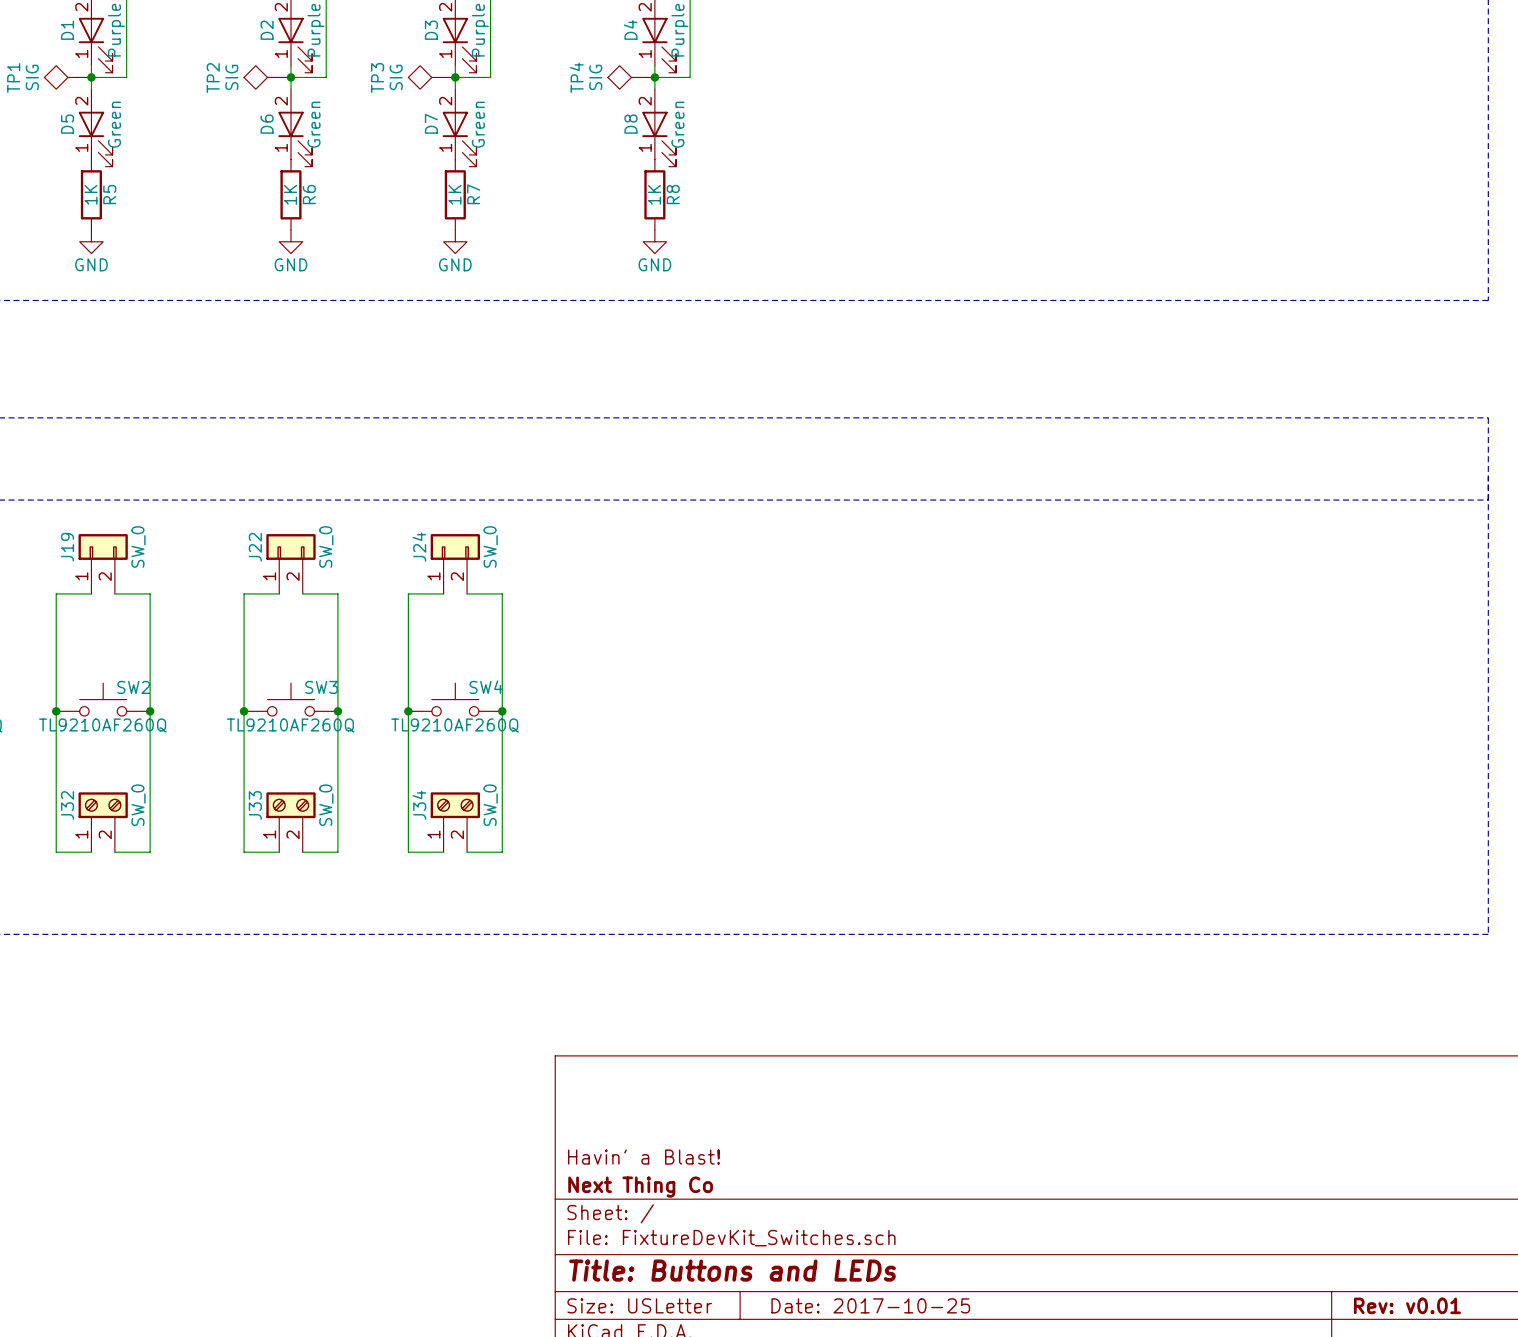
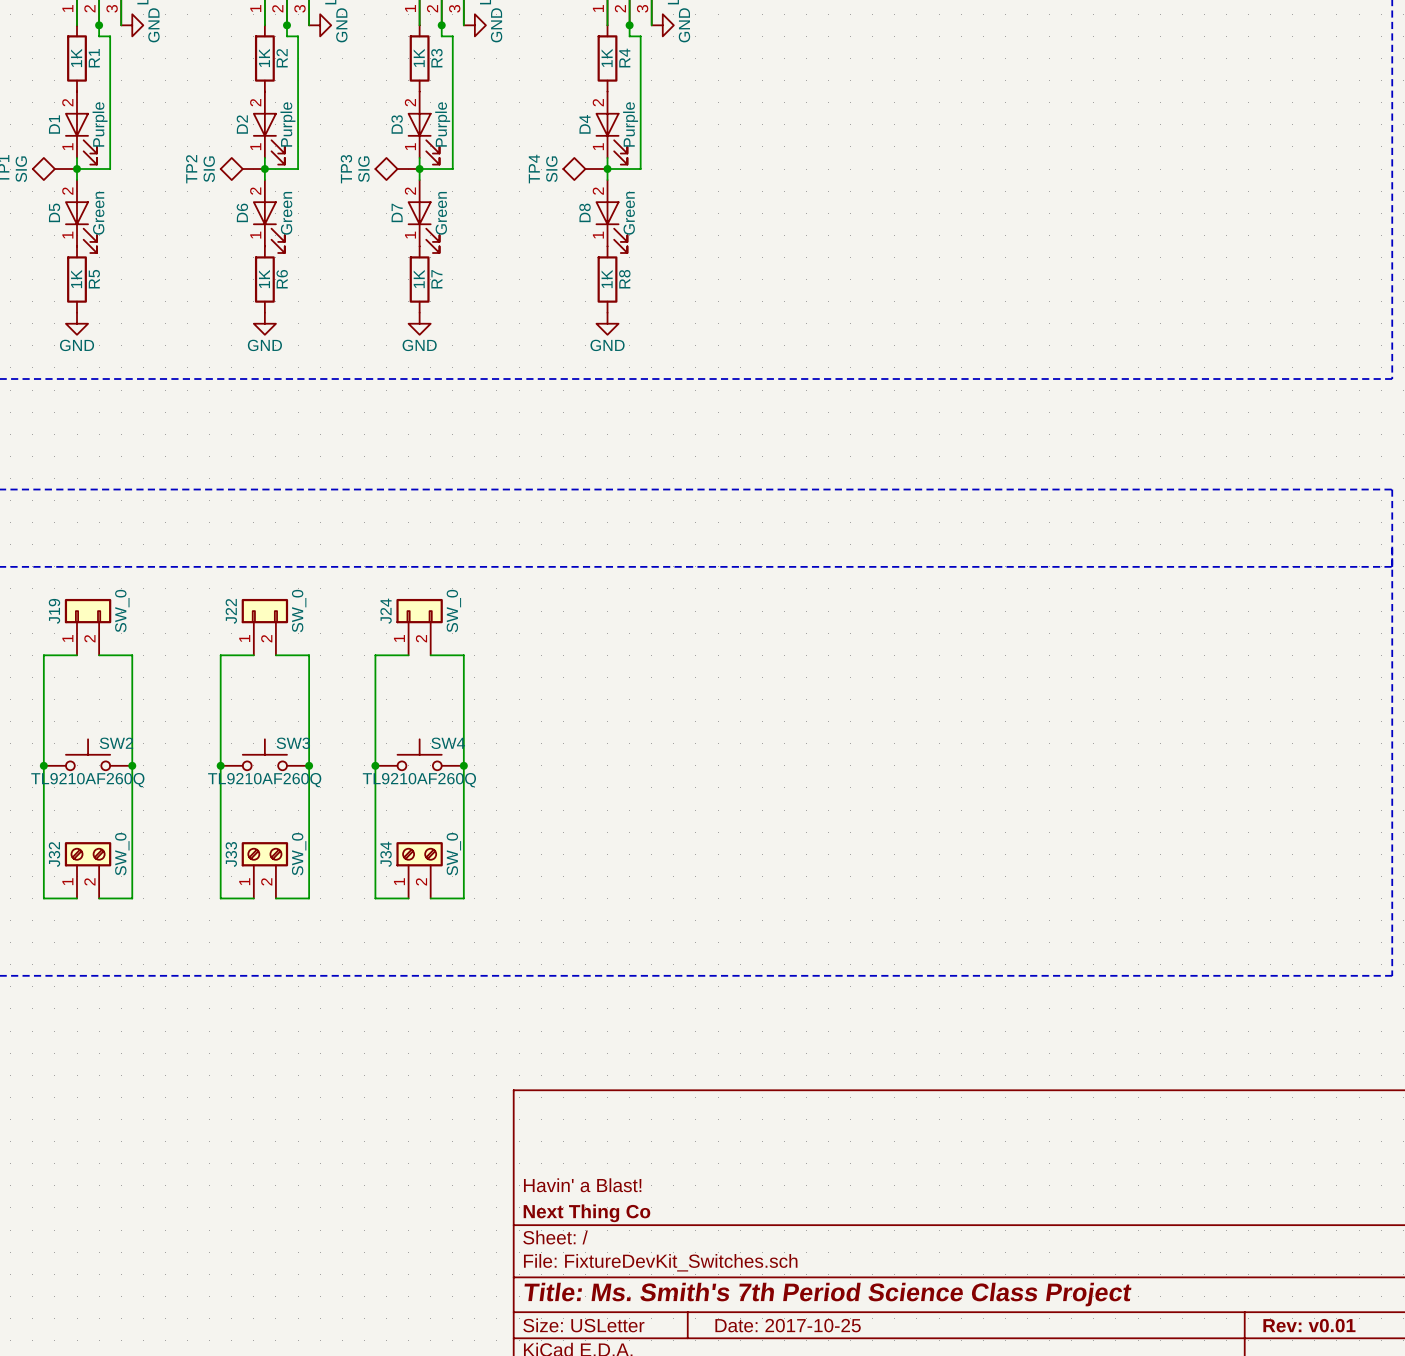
title block: Title: Buttons and LEDs (732, 1270) -> Title: Ms. Smith's 7th Period Science Class Project (827, 1294)

